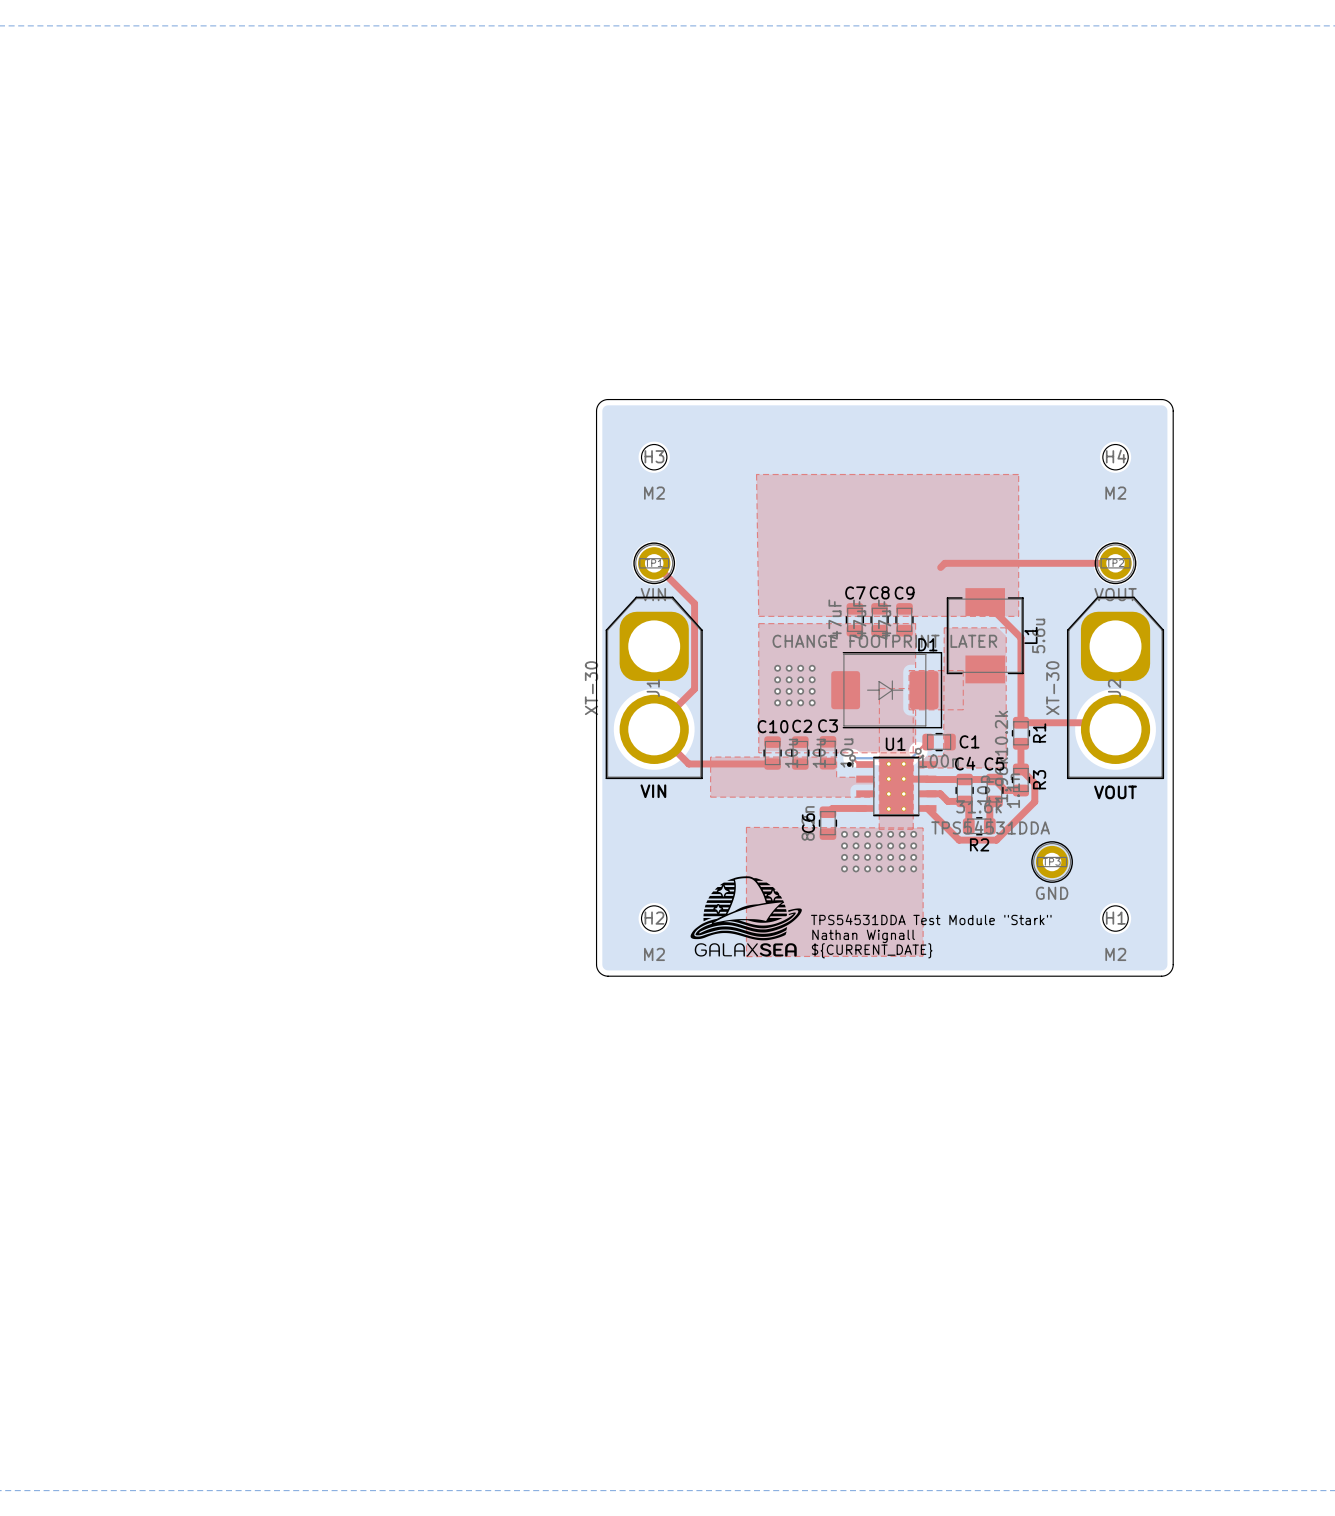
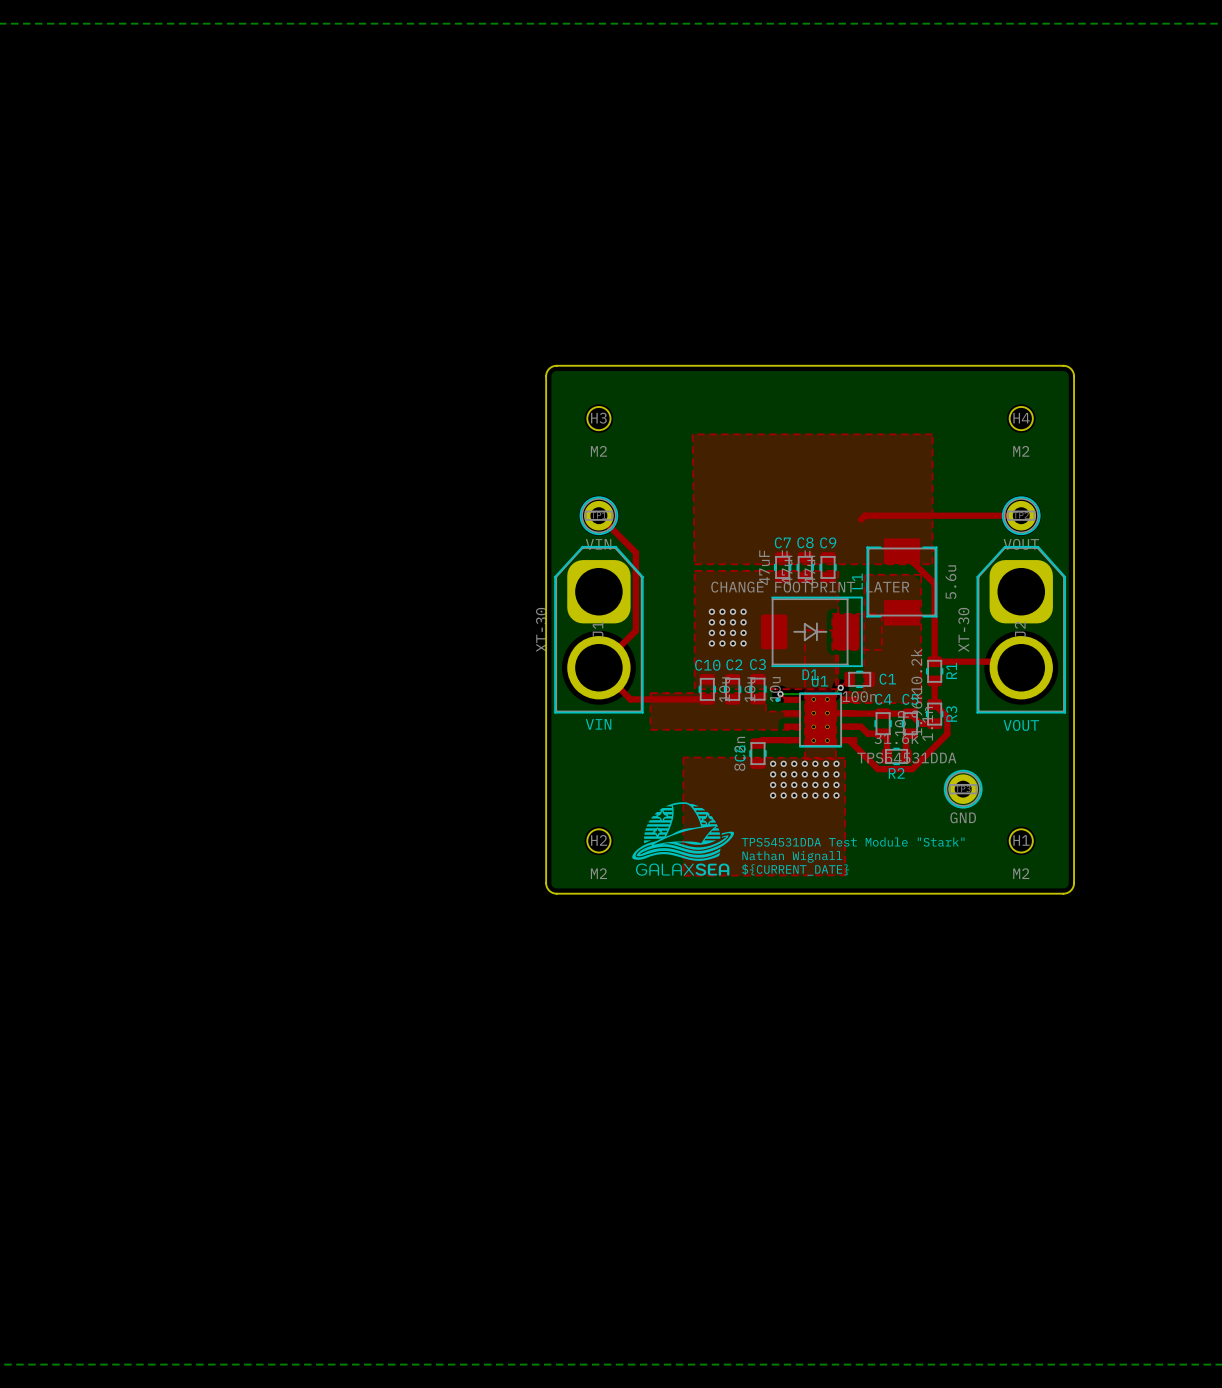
L1 name position: L1 (1030, 635) -> L1 (857, 581)
D1 name position: D1 (927, 644) -> D1 (810, 674)

